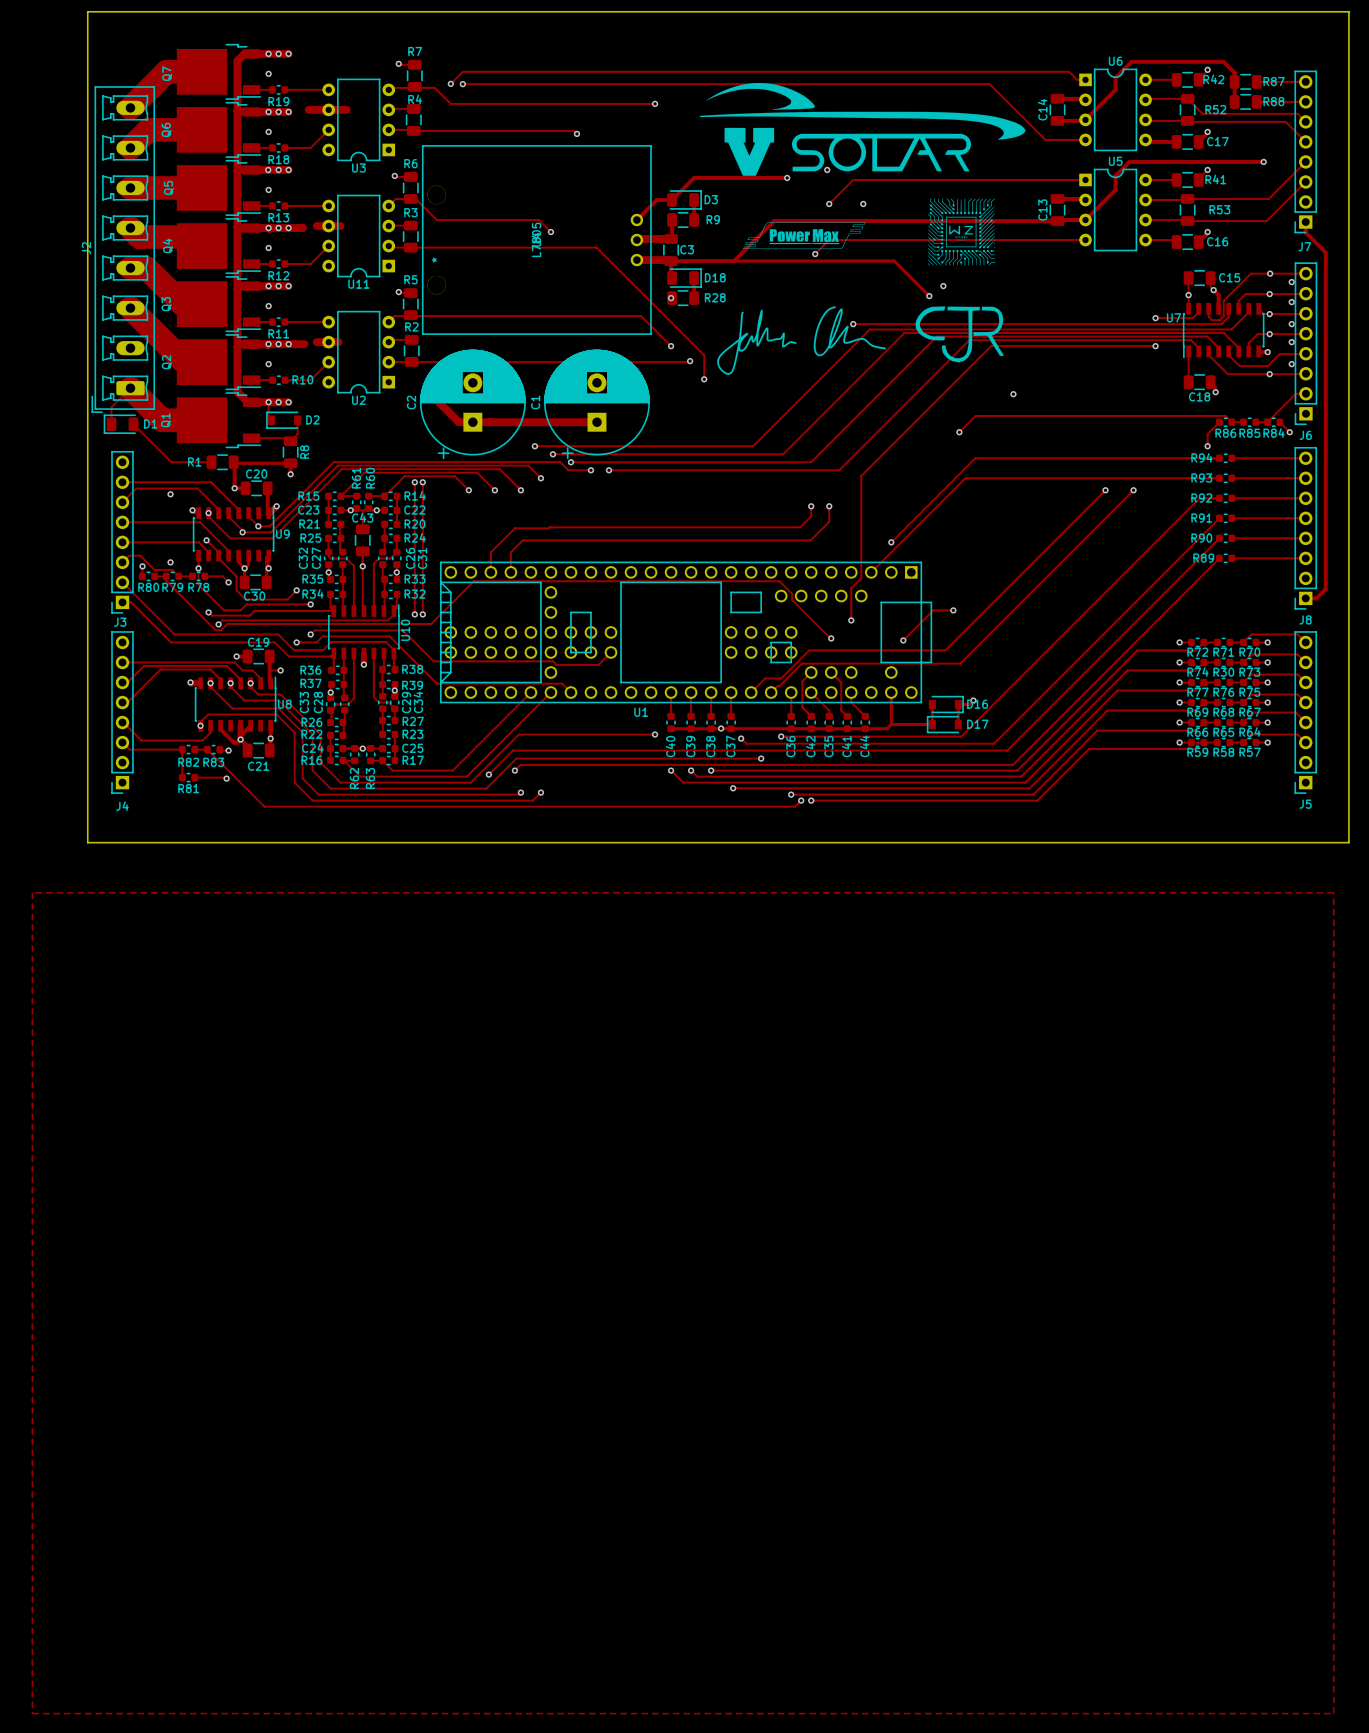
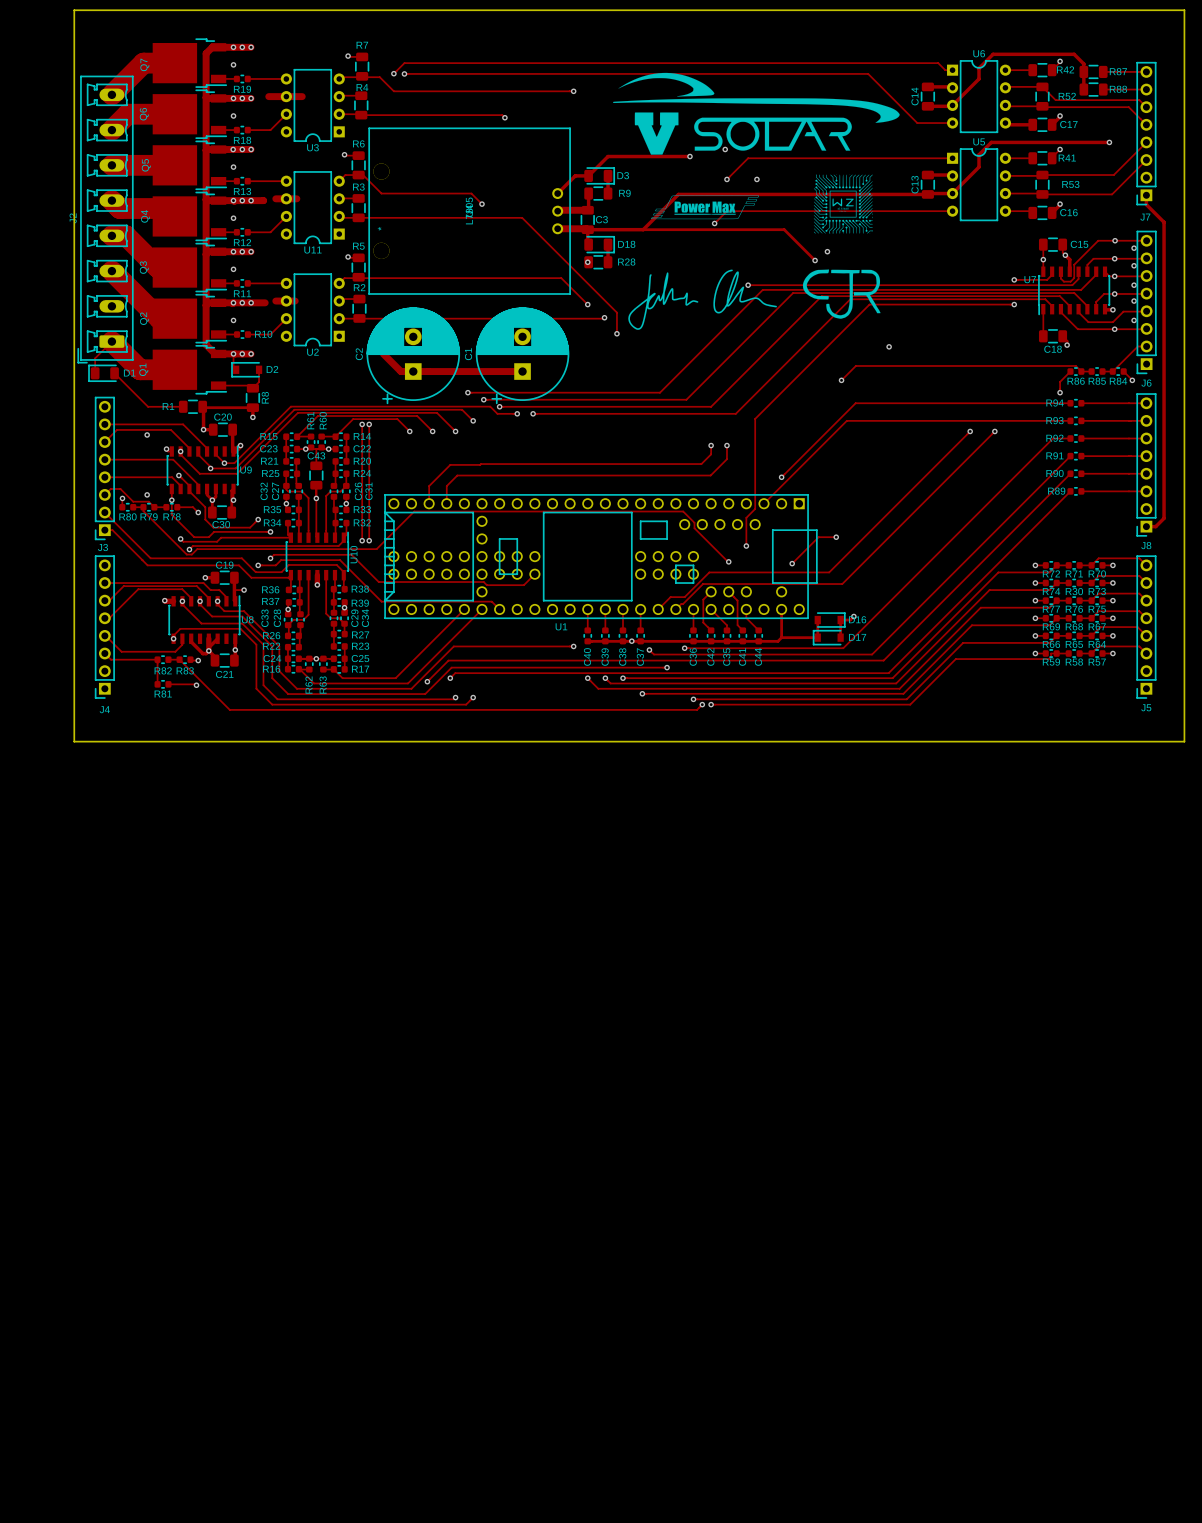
zone outline: (32, 892) (32, 1713) (1333, 1713) (1333, 892) (32, 892) -> none

